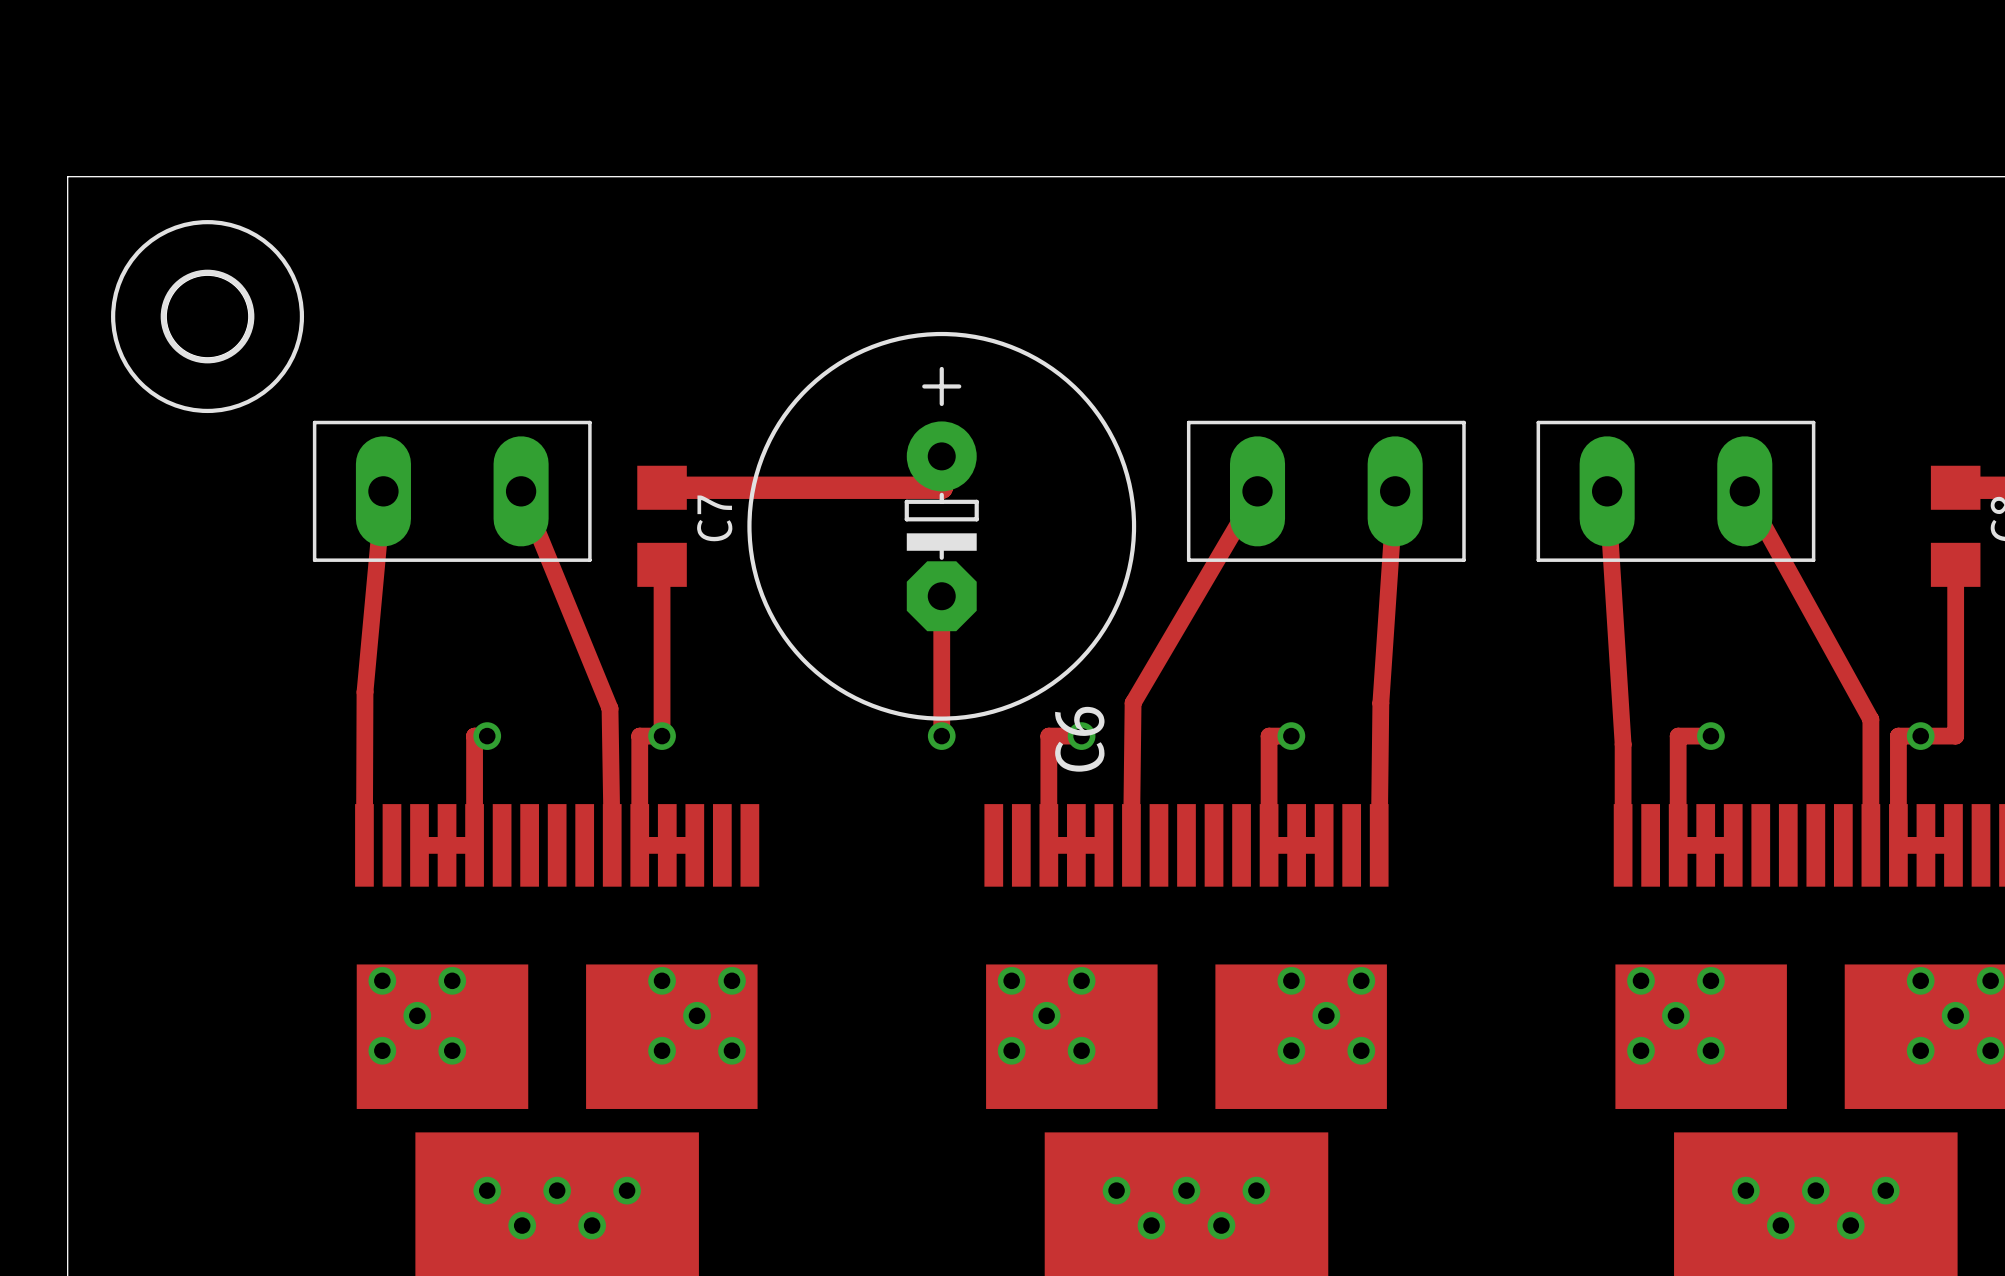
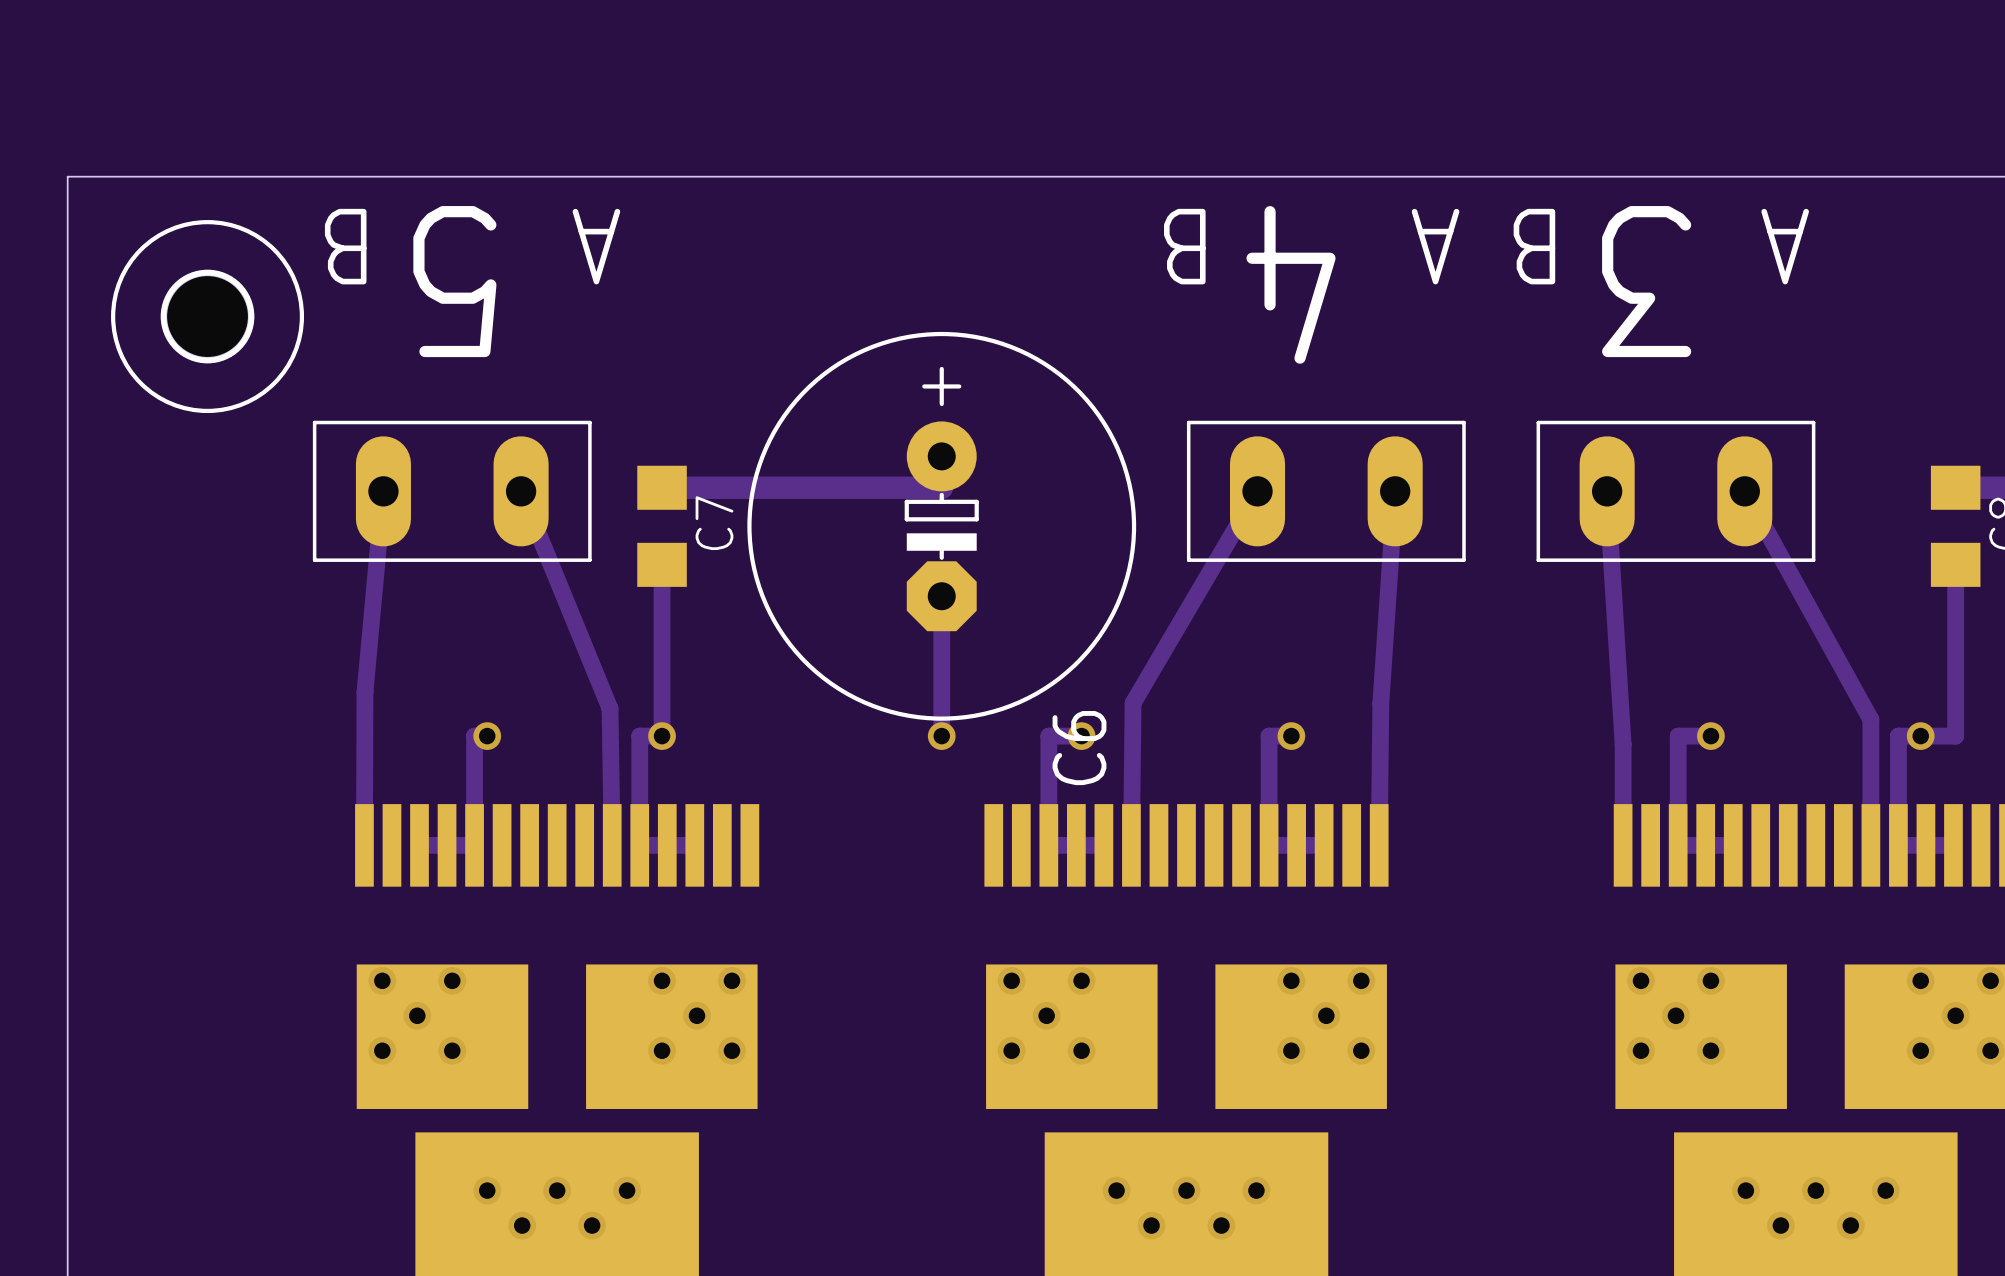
text: none -> B (345, 246)
text: none -> A (596, 246)
text: none -> B (1184, 246)
text: none -> A (1435, 246)
text: none -> B (1534, 246)
text: none -> A (1785, 246)
text: none -> 5 (454, 281)
text: none -> 3 (1646, 281)
text: none -> 4 (1291, 284)

